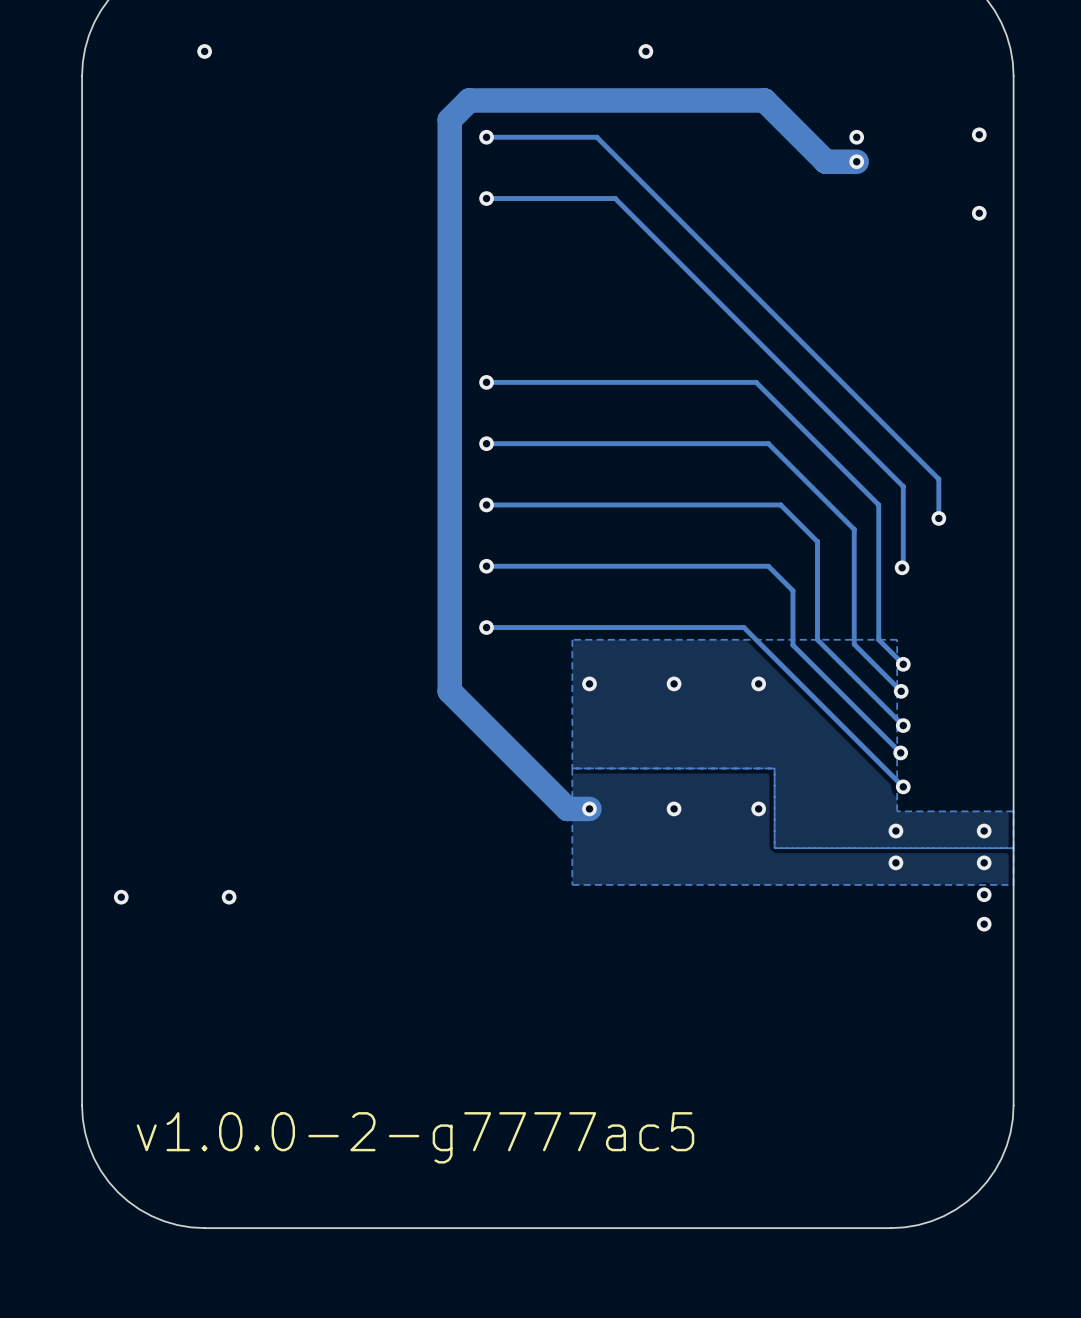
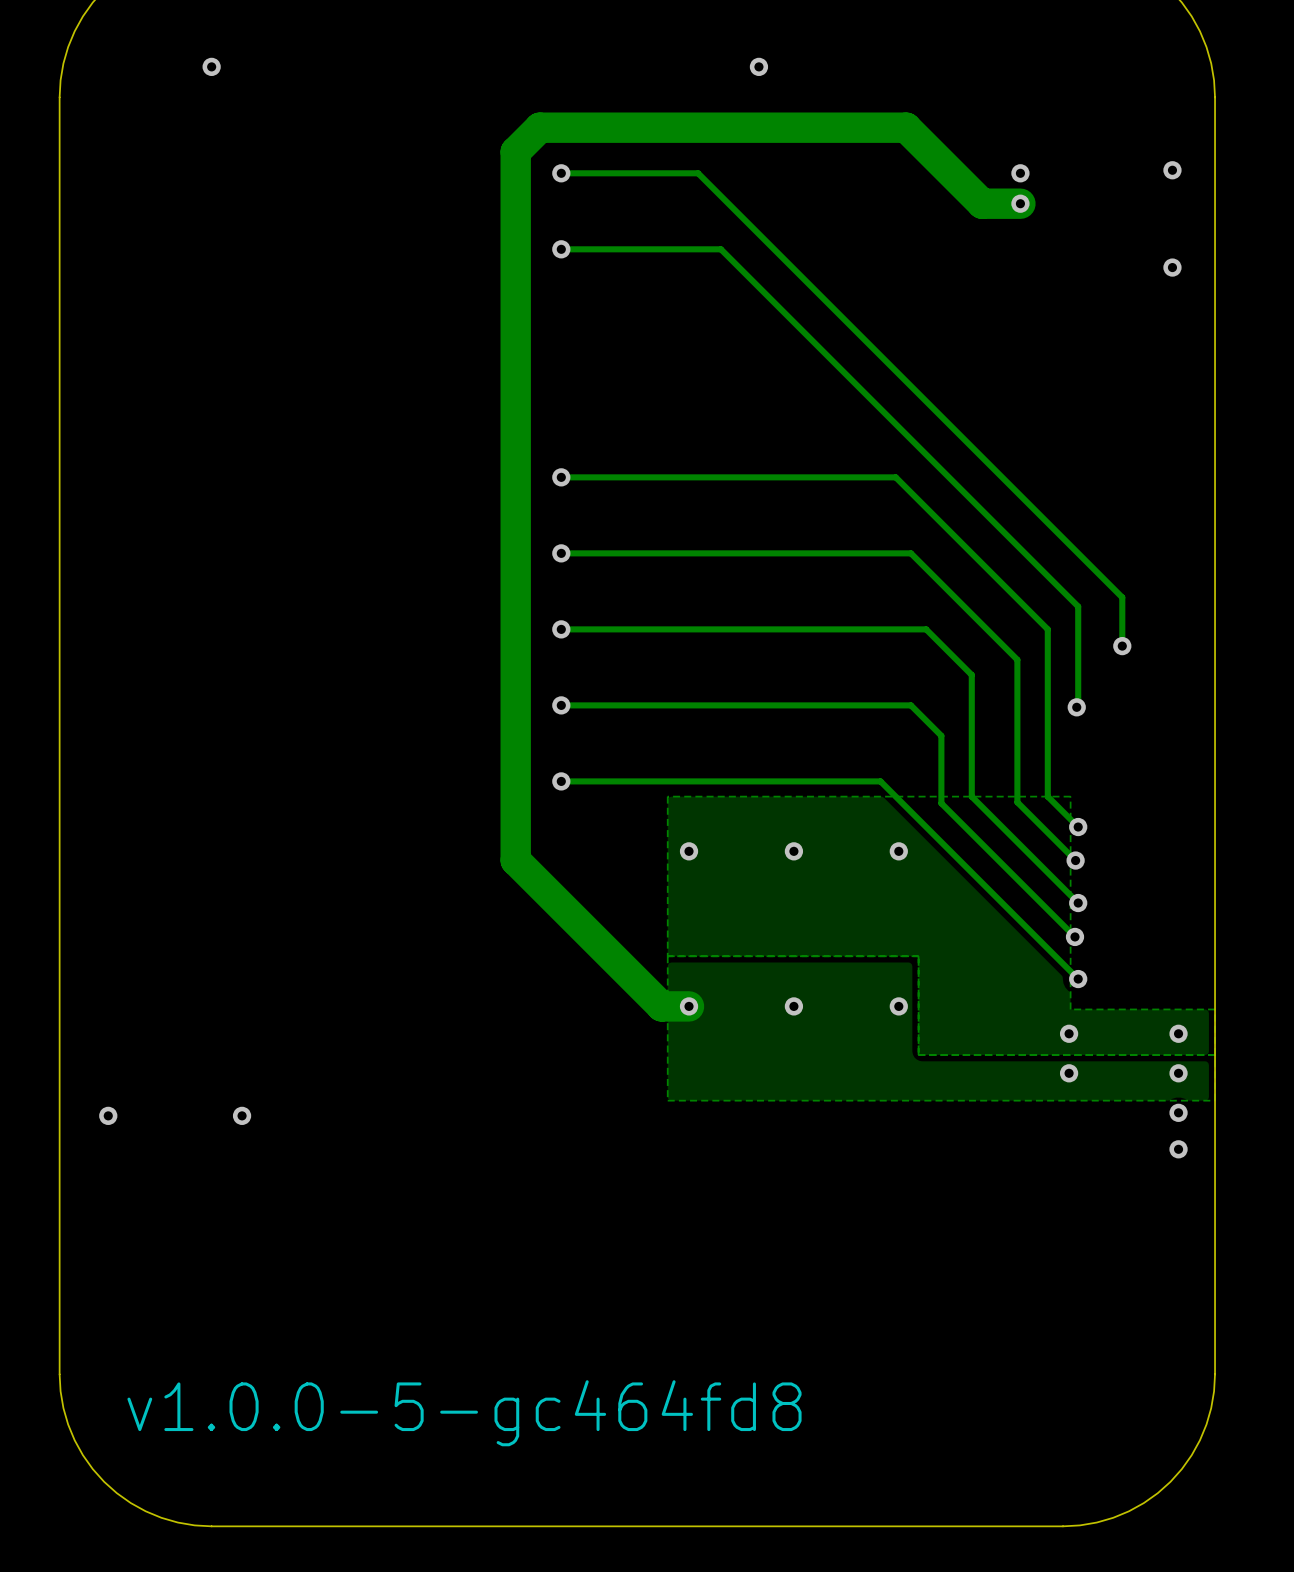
text: v1.0.0-2-g7777ac5 (415, 1137) -> v1.0.0-5-gc464fd8 (464, 1413)

